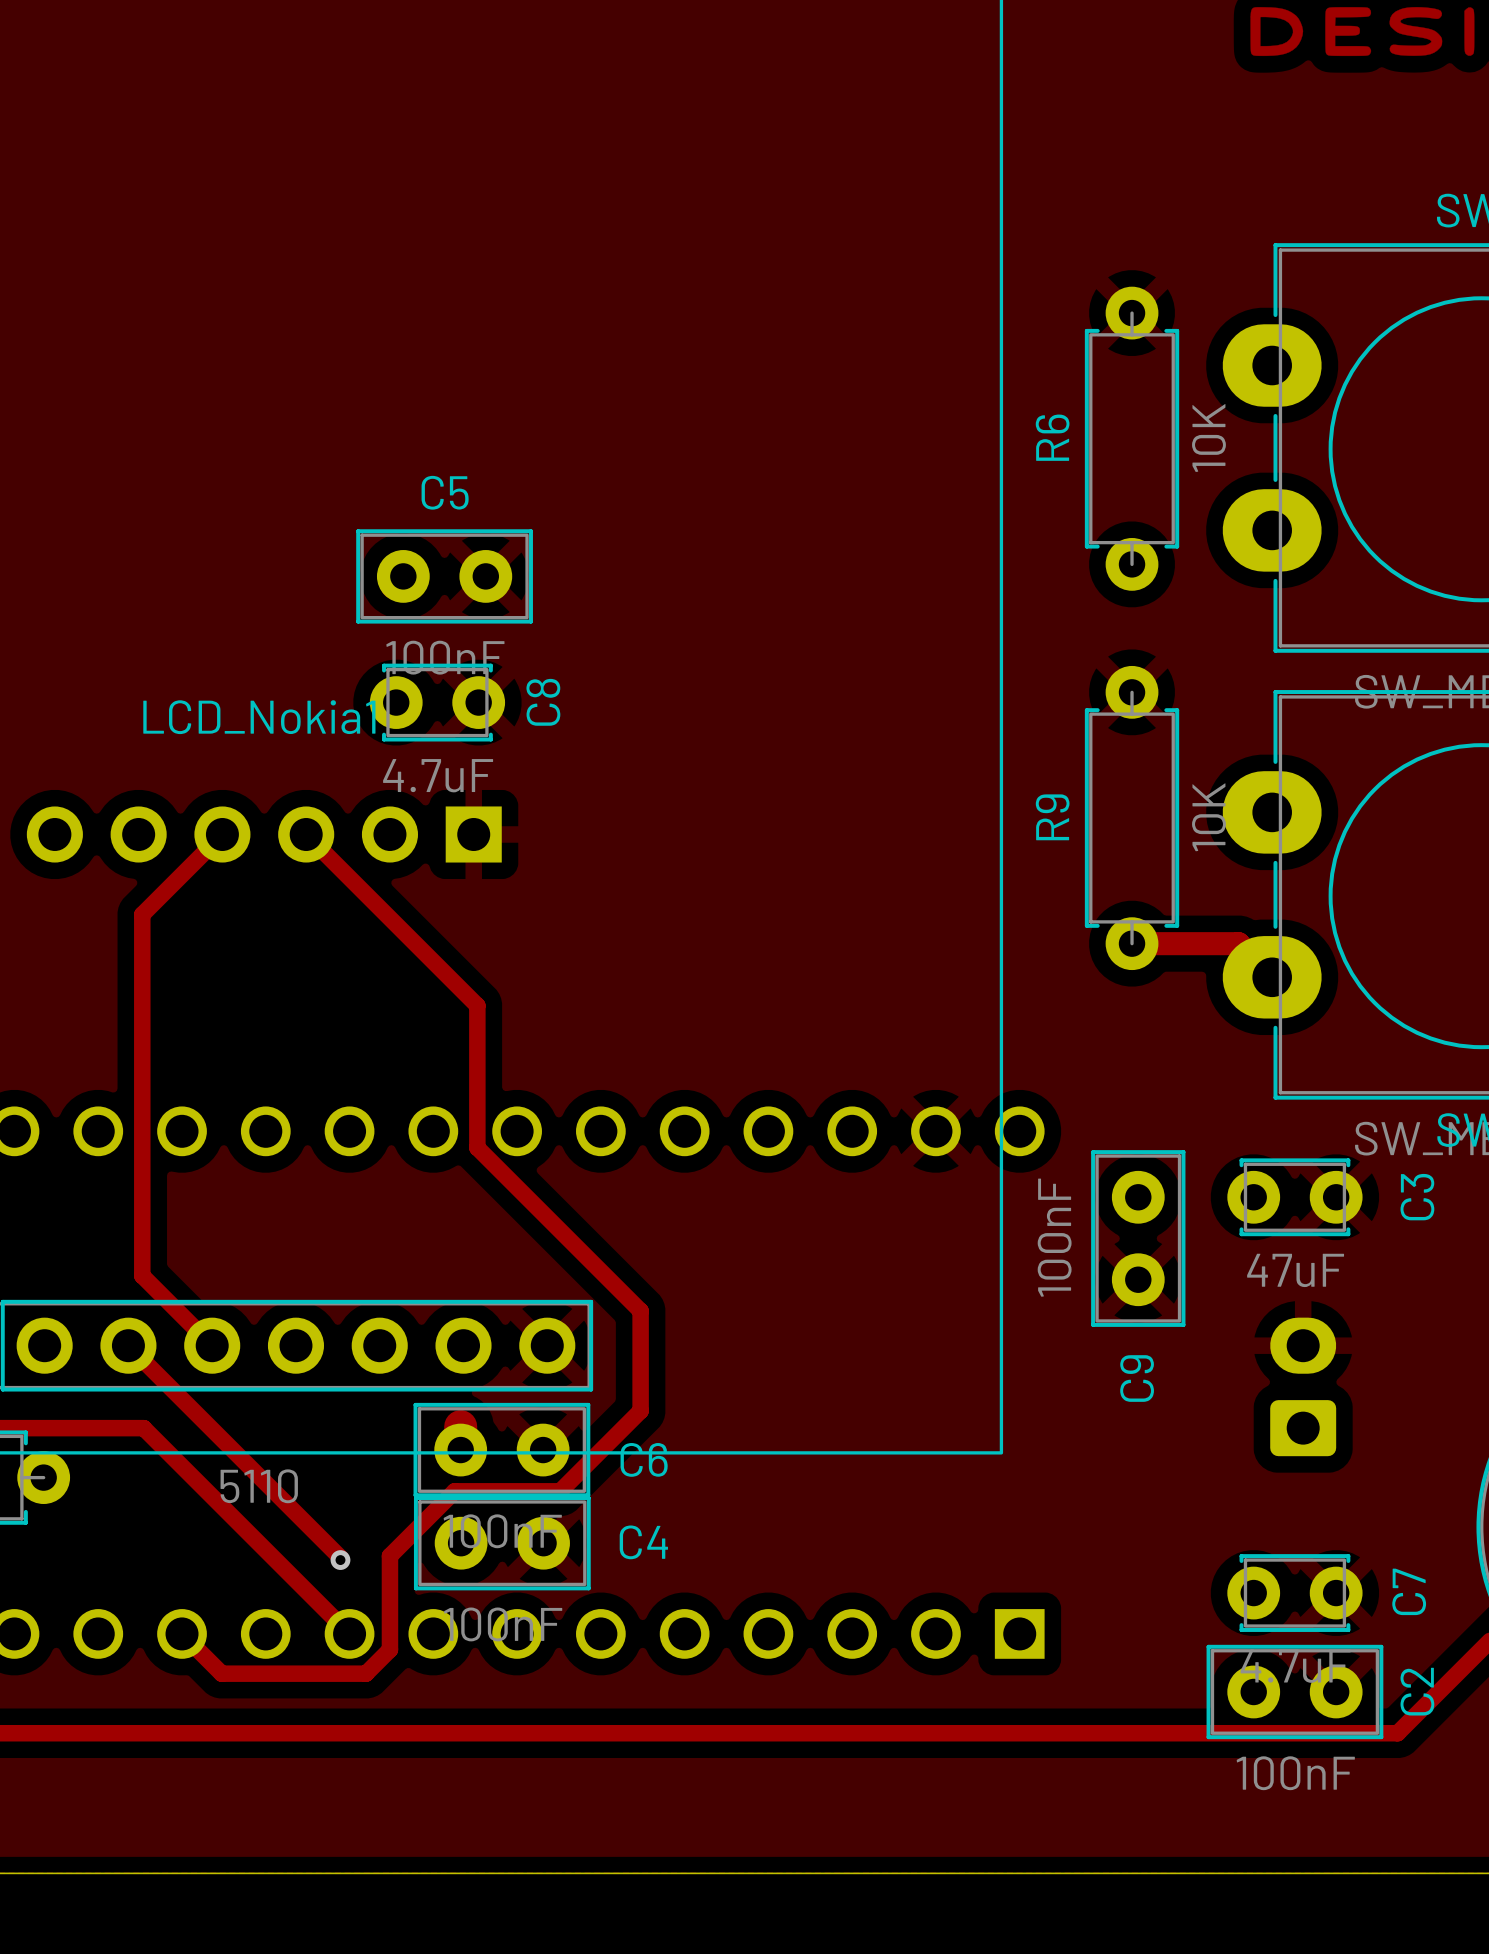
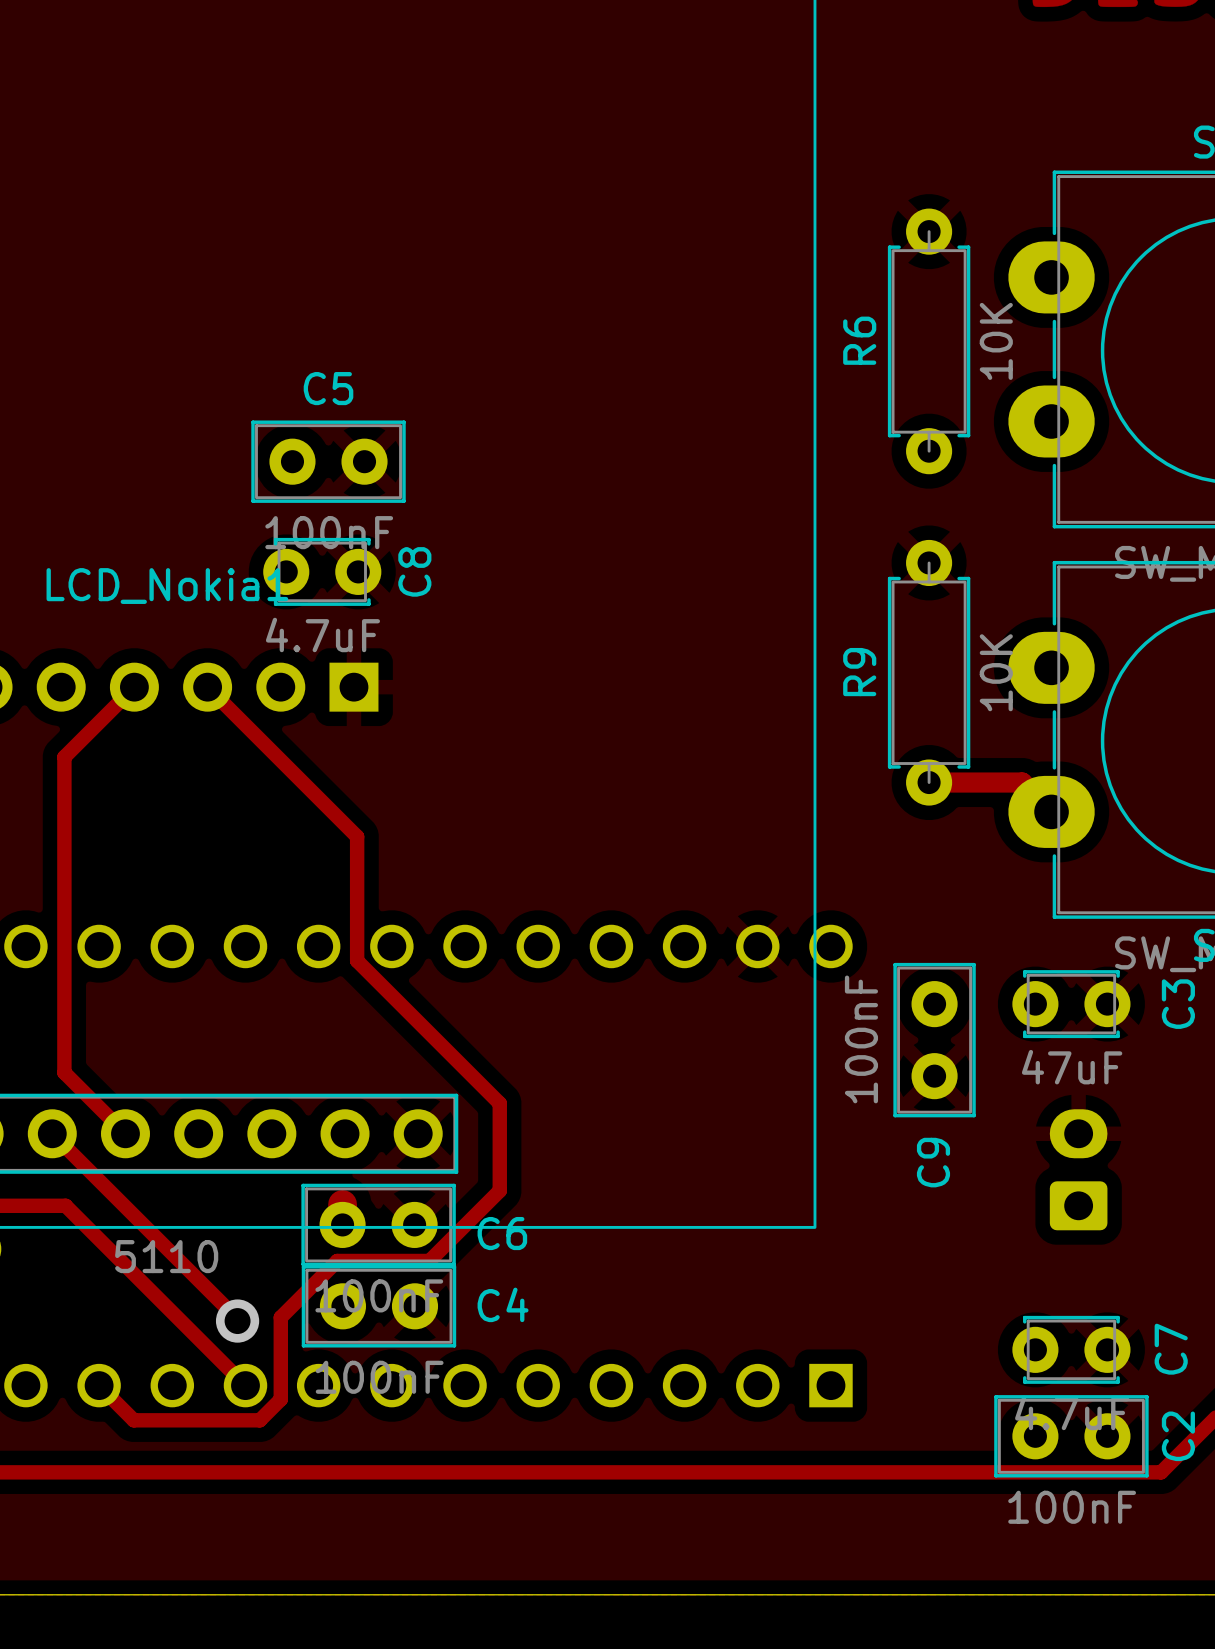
via size: [330, 1550, 351, 1570] -> [215, 1299, 260, 1343]

